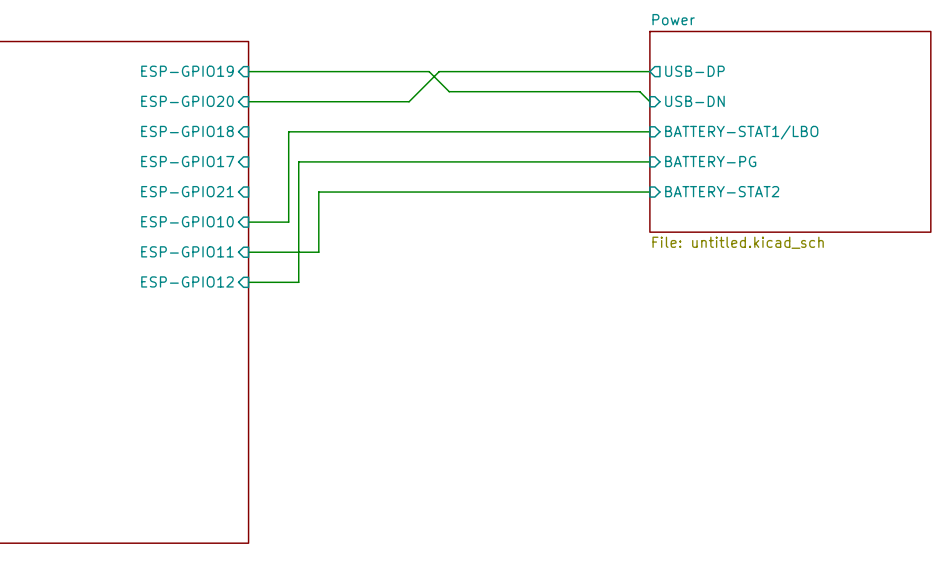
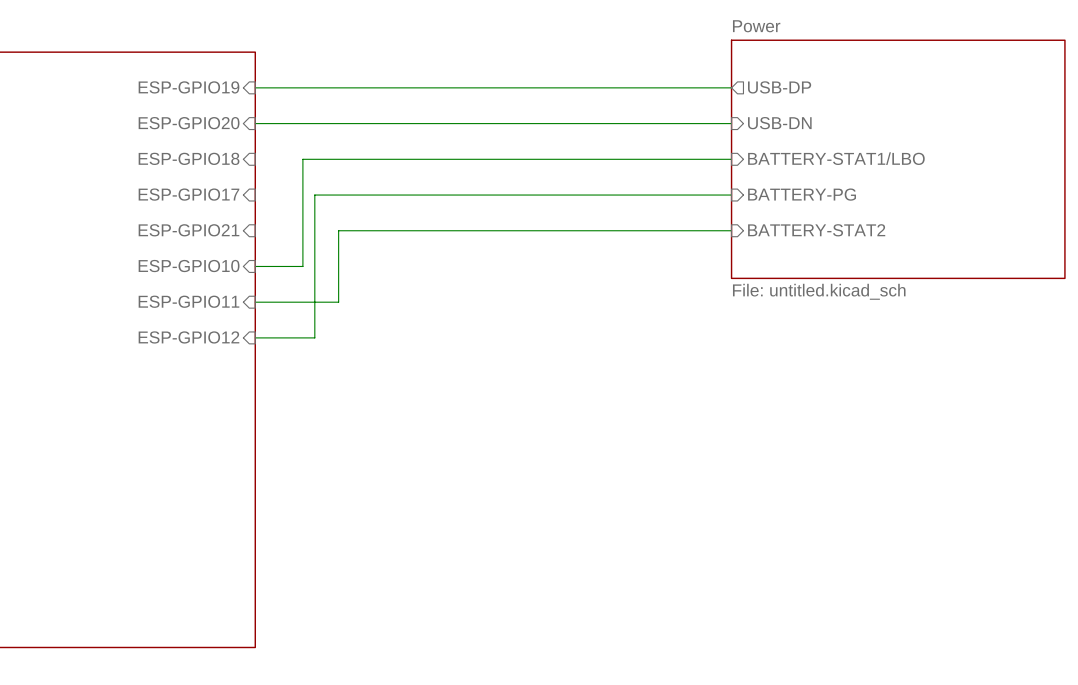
wire: (429, 71) (449, 91) (639, 91) (649, 101) -> (445, 123) (731, 123)
wire: (439, 71) (409, 101) -> (481, 87) (469, 87)

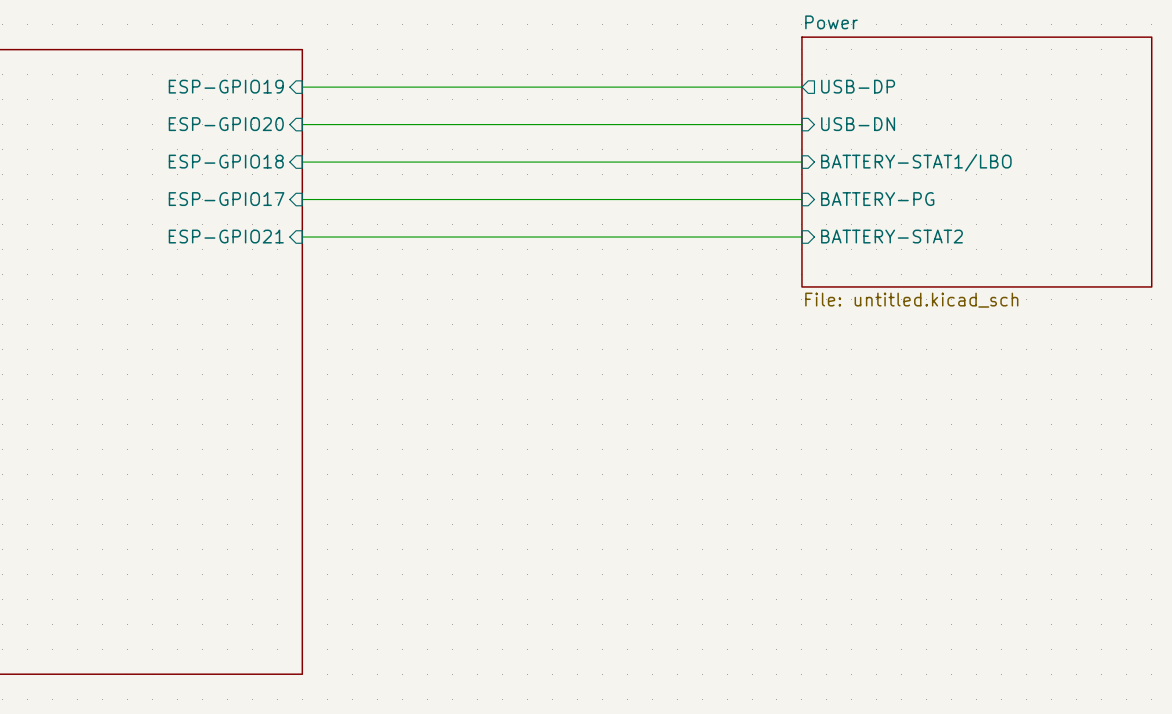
wire: (302, 159) (302, 266) (255, 266) -> (352, 162) (302, 162)
wire: (314, 195) (314, 337) (255, 337) -> (364, 199) (302, 199)
wire: (338, 230) (338, 302) (255, 302) -> (389, 237) (302, 237)
sheet pin: ESP-GPIO10 (189, 266) -> none
sheet pin: ESP-GPIO11 (188, 301) -> none
sheet pin: ESP-GPIO12 (188, 337) -> none

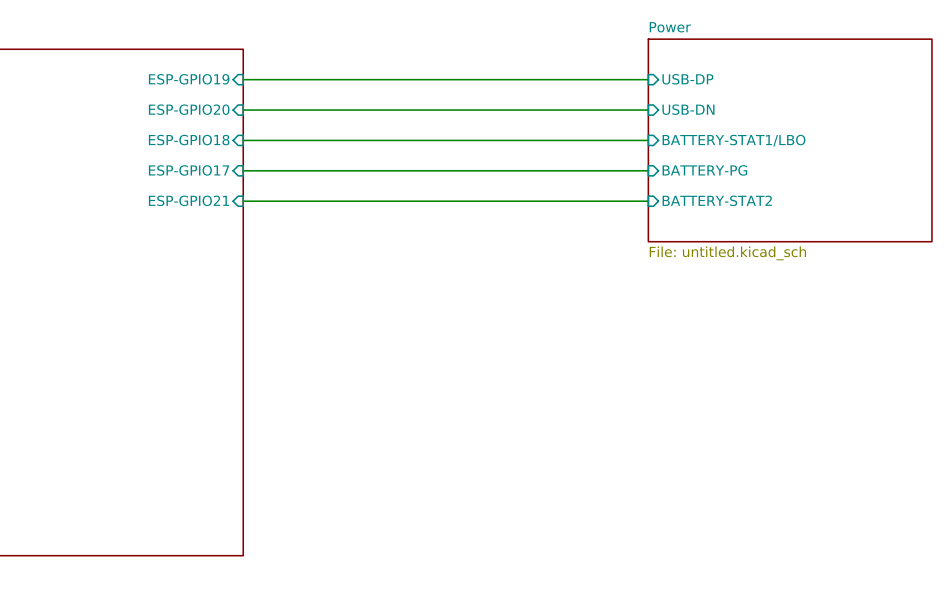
sheet pin shape: output (858, 86) -> input (687, 79)

